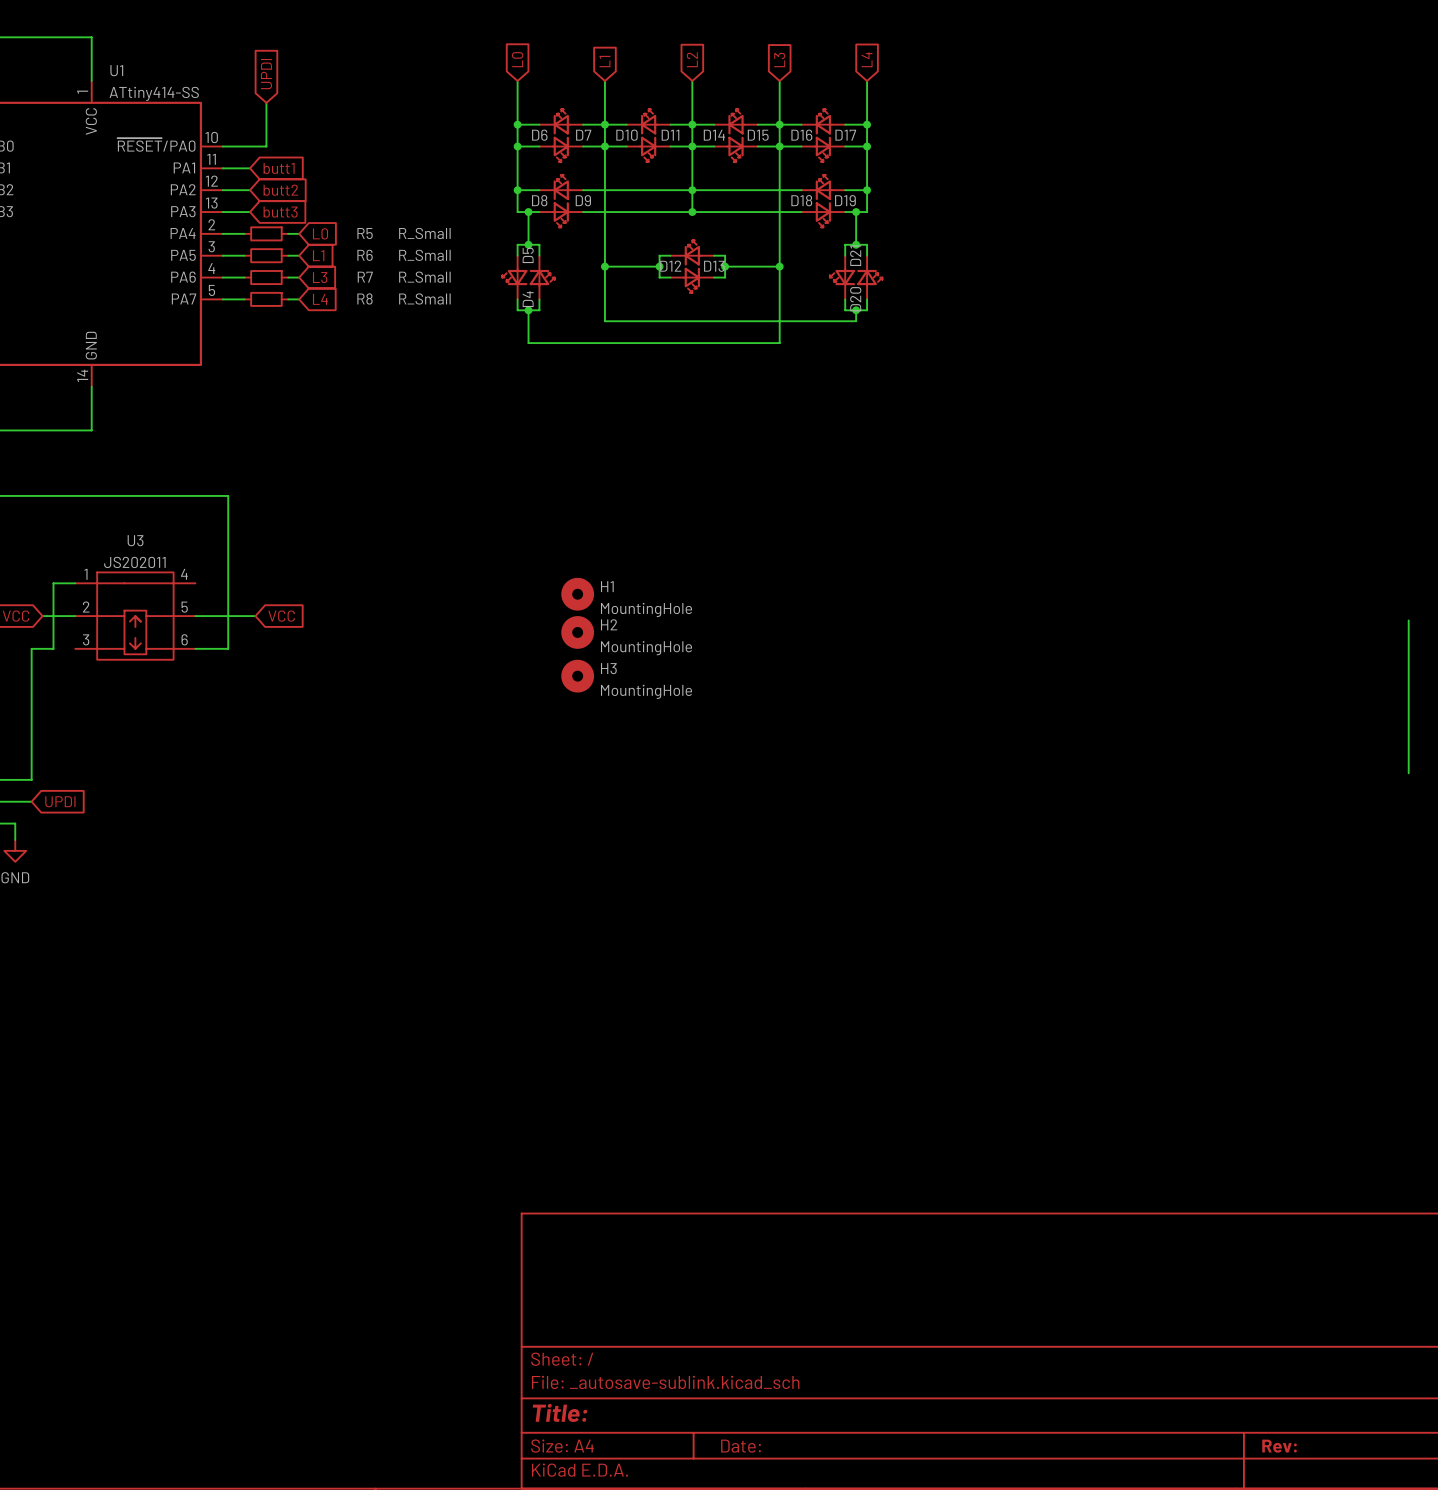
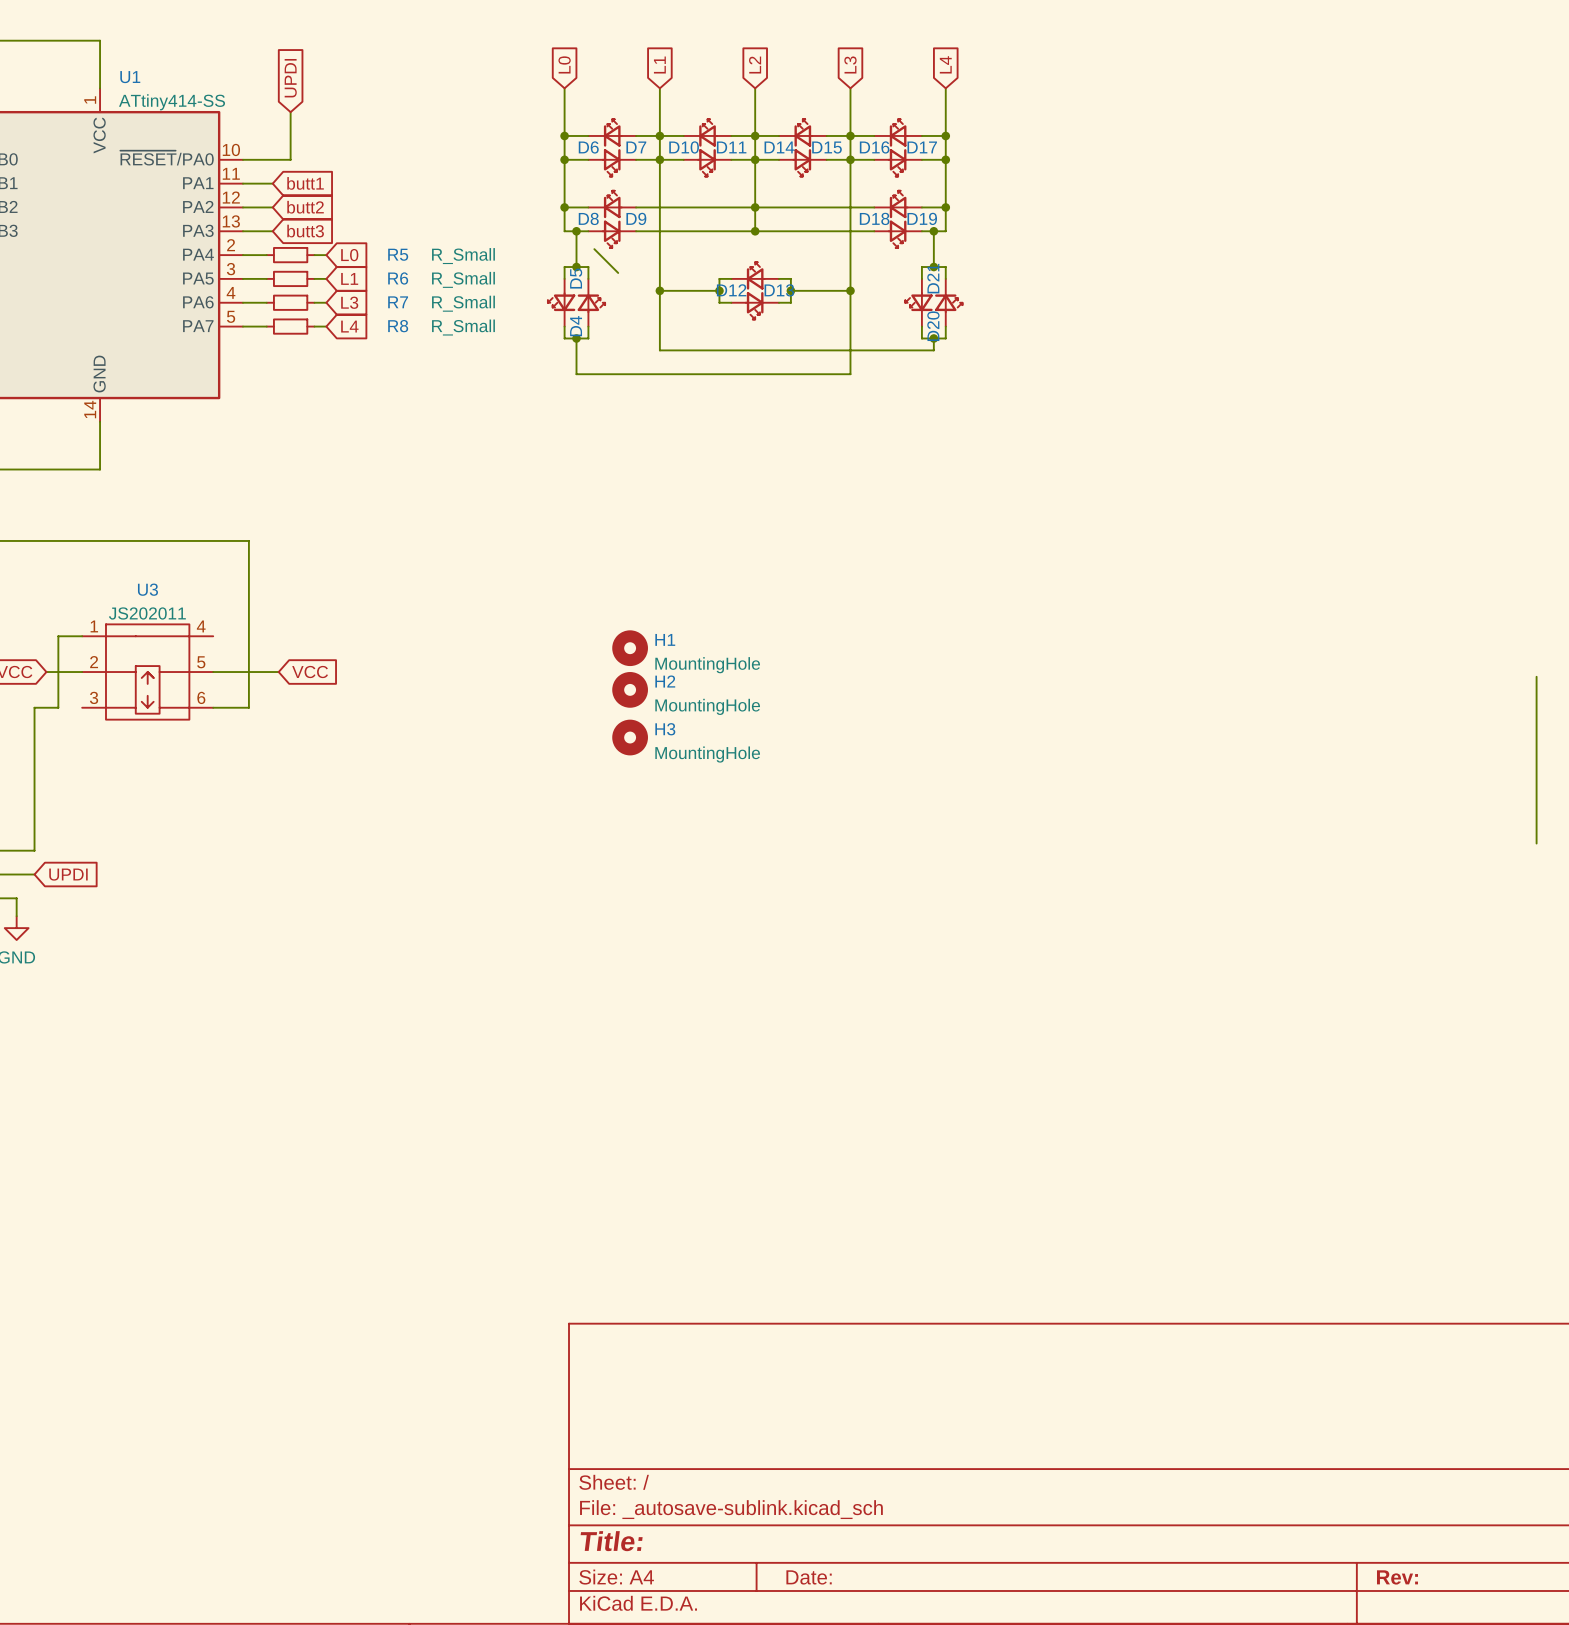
wire: none -> (594, 249) (618, 272)

